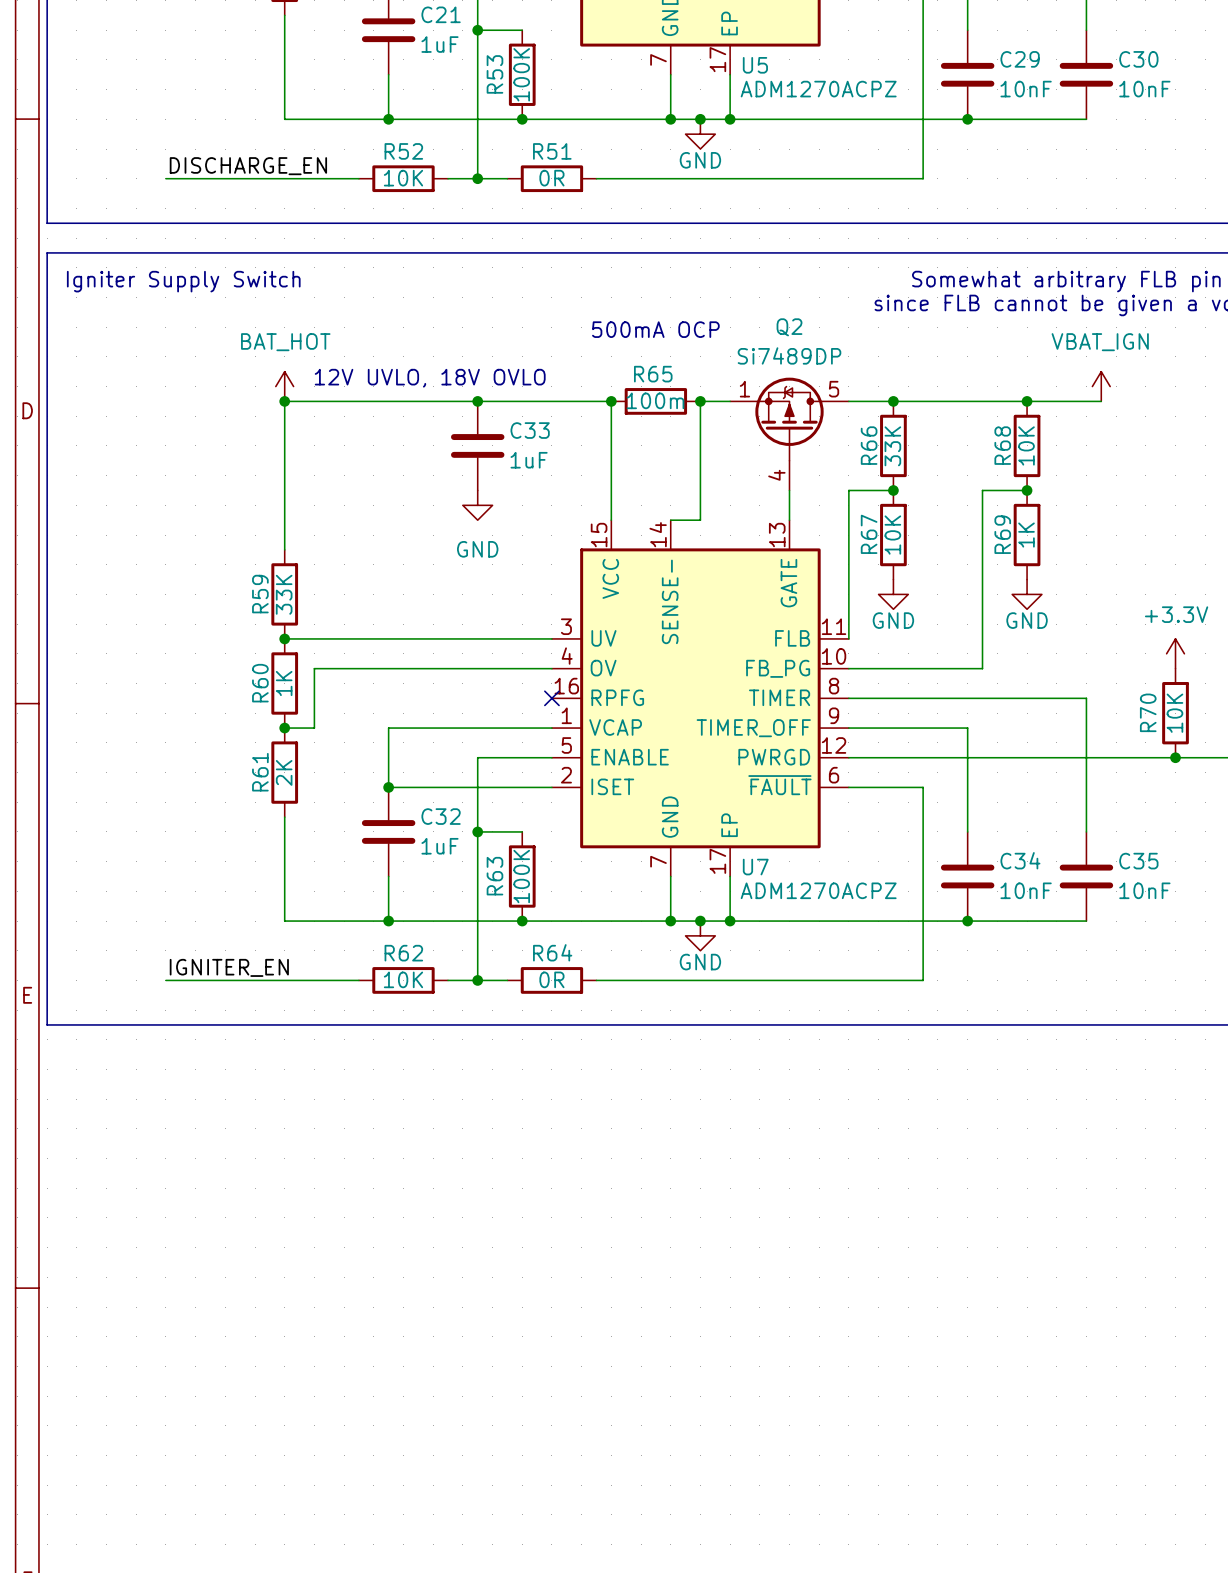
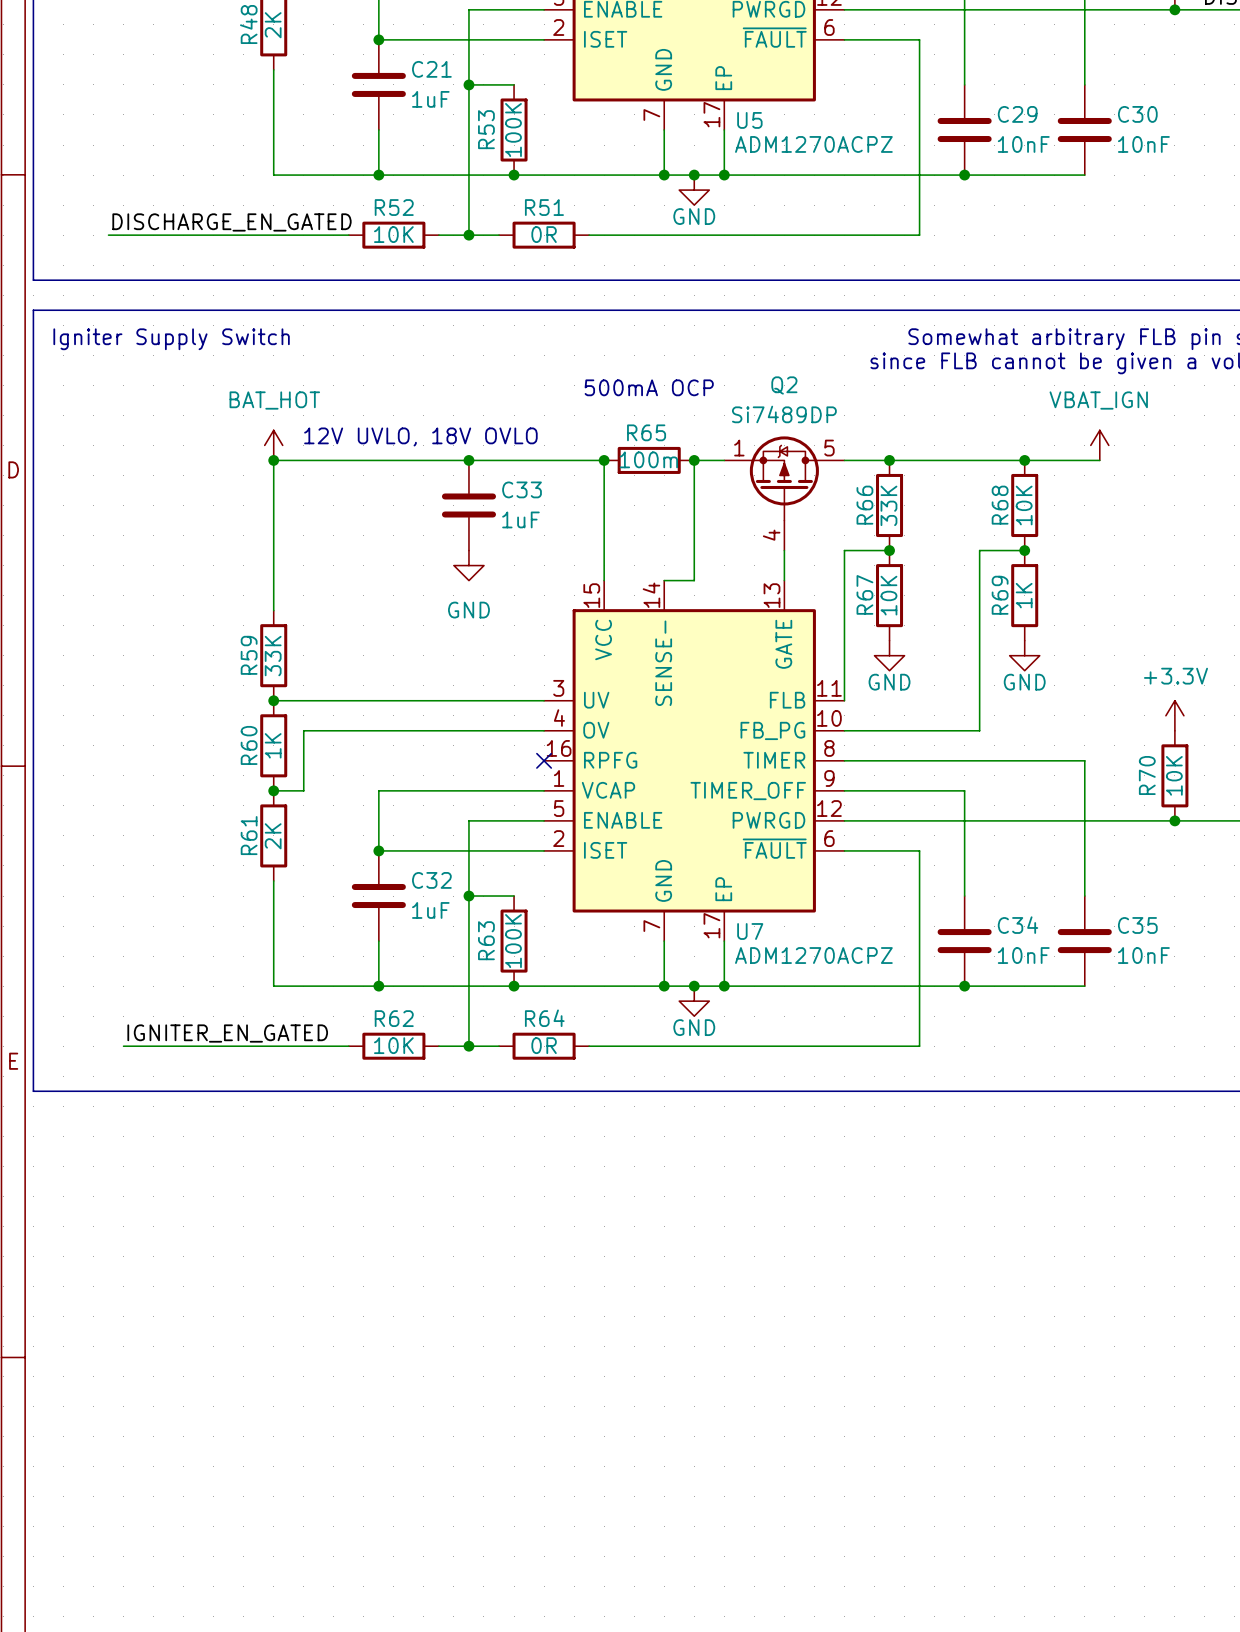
label: DISCHARGE_EN (248, 166) -> DISCHARGE_EN_GATED (231, 222)
wire: none -> (108, 235) (153, 235)
label: IGNITER_EN (229, 967) -> IGNITER_EN_GATED (227, 1033)
wire: none -> (123, 1046) (153, 1046)

